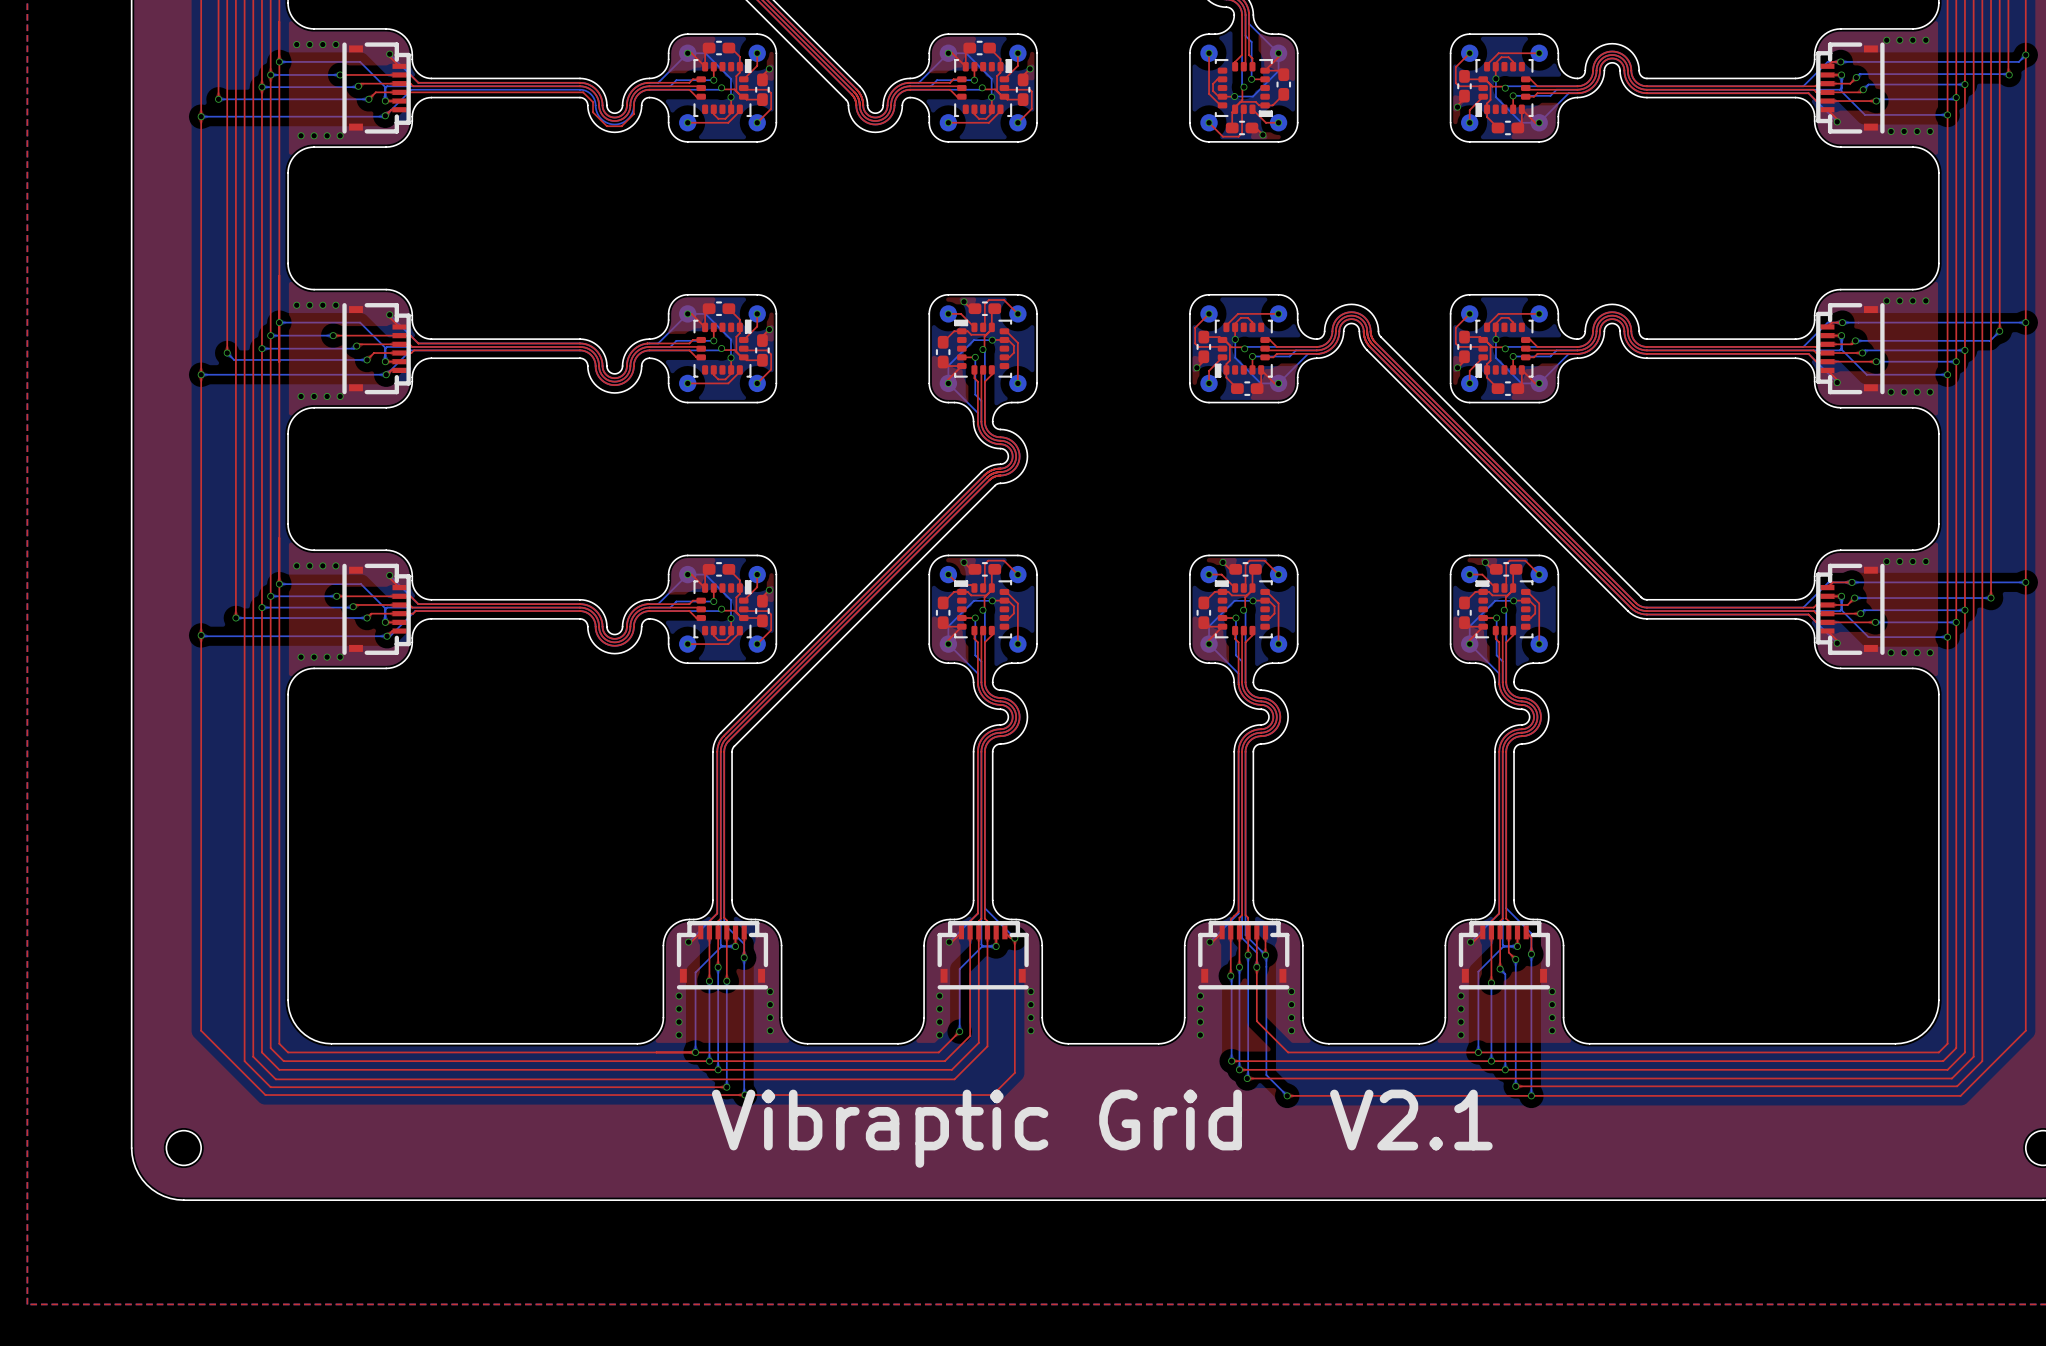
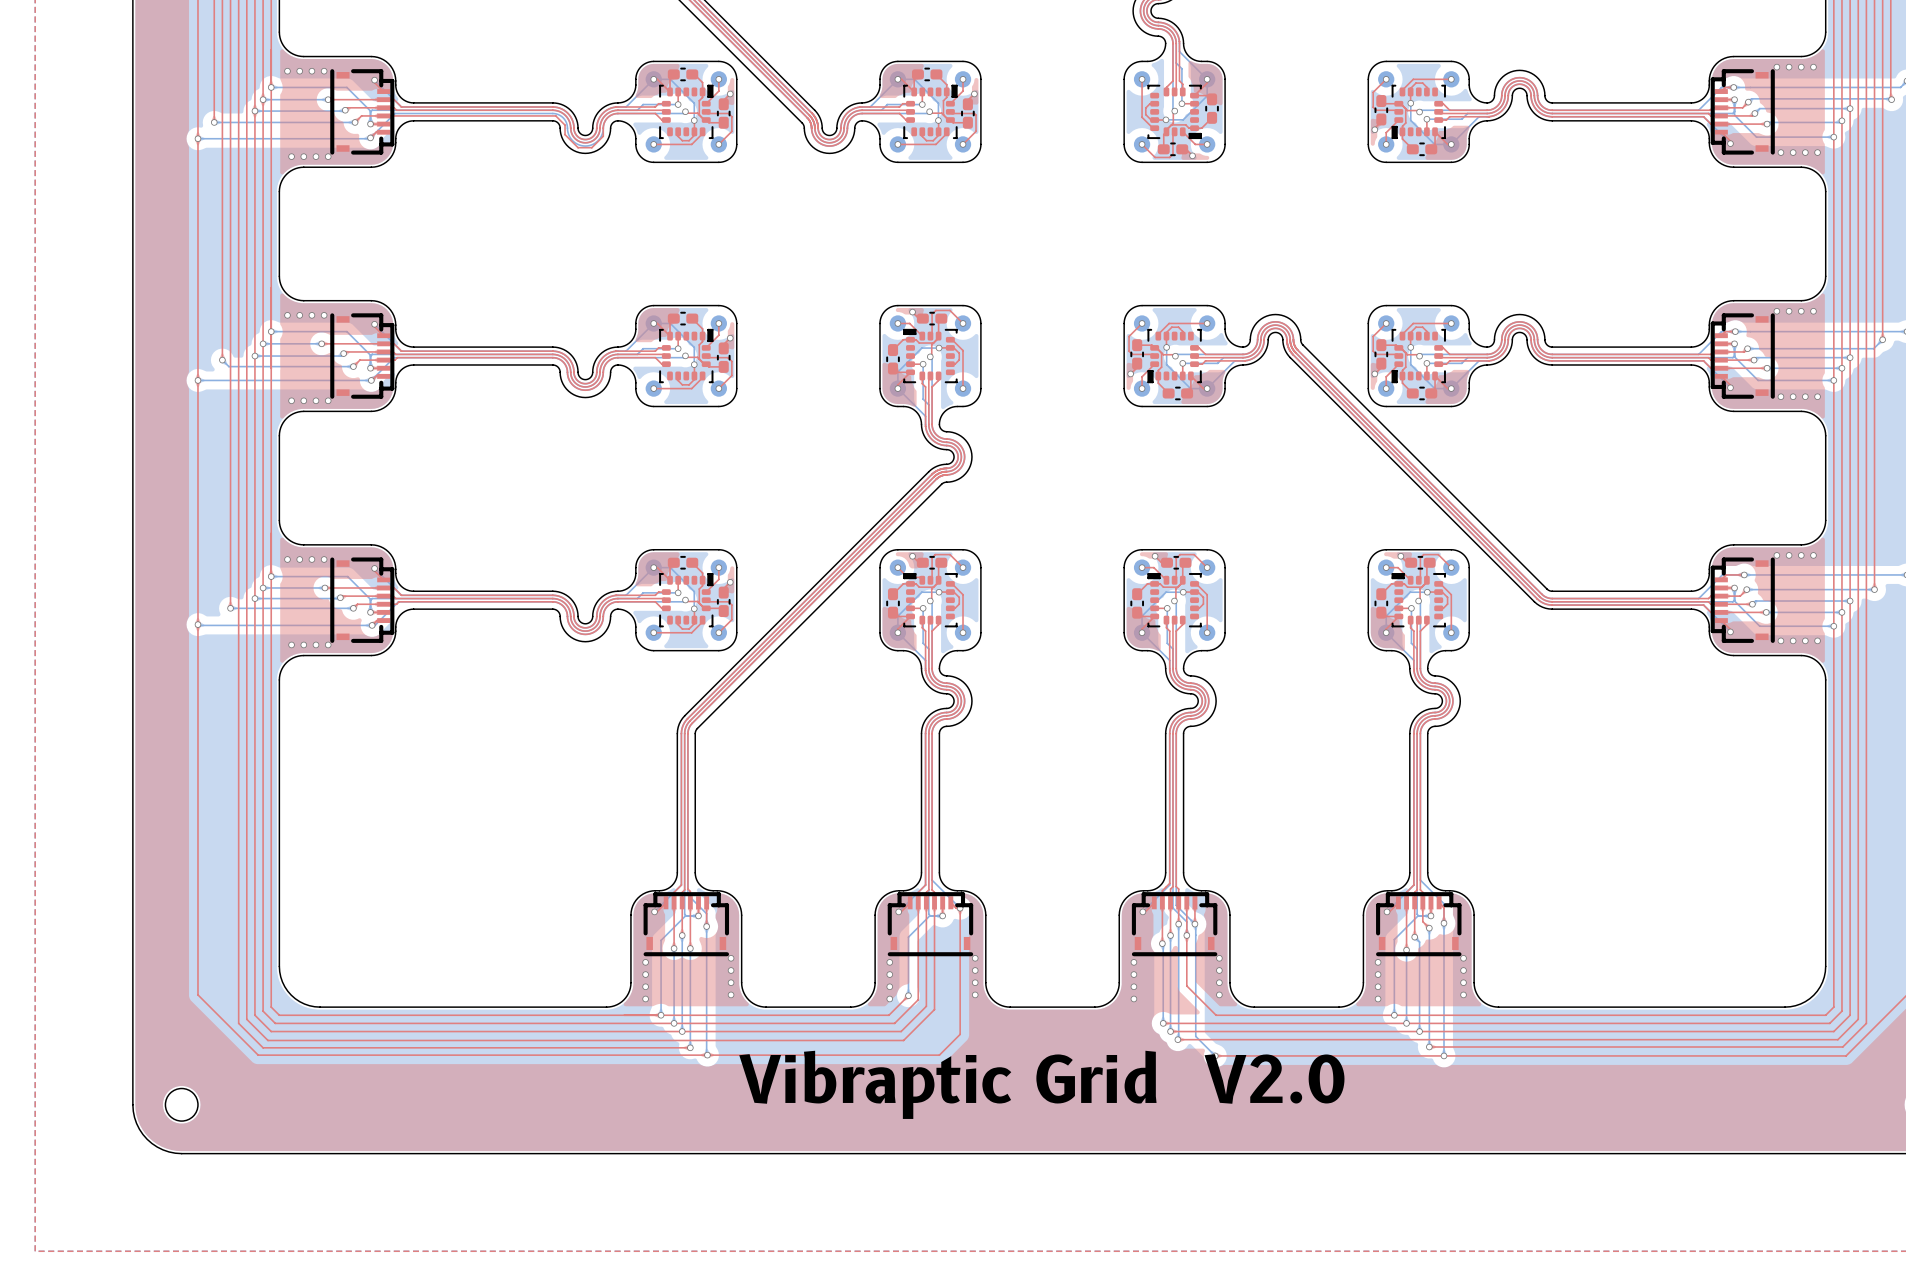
text: Vibraptic Grid V2.1 (1102, 1128) -> Vibraptic Grid V2.0 (1041, 1084)

